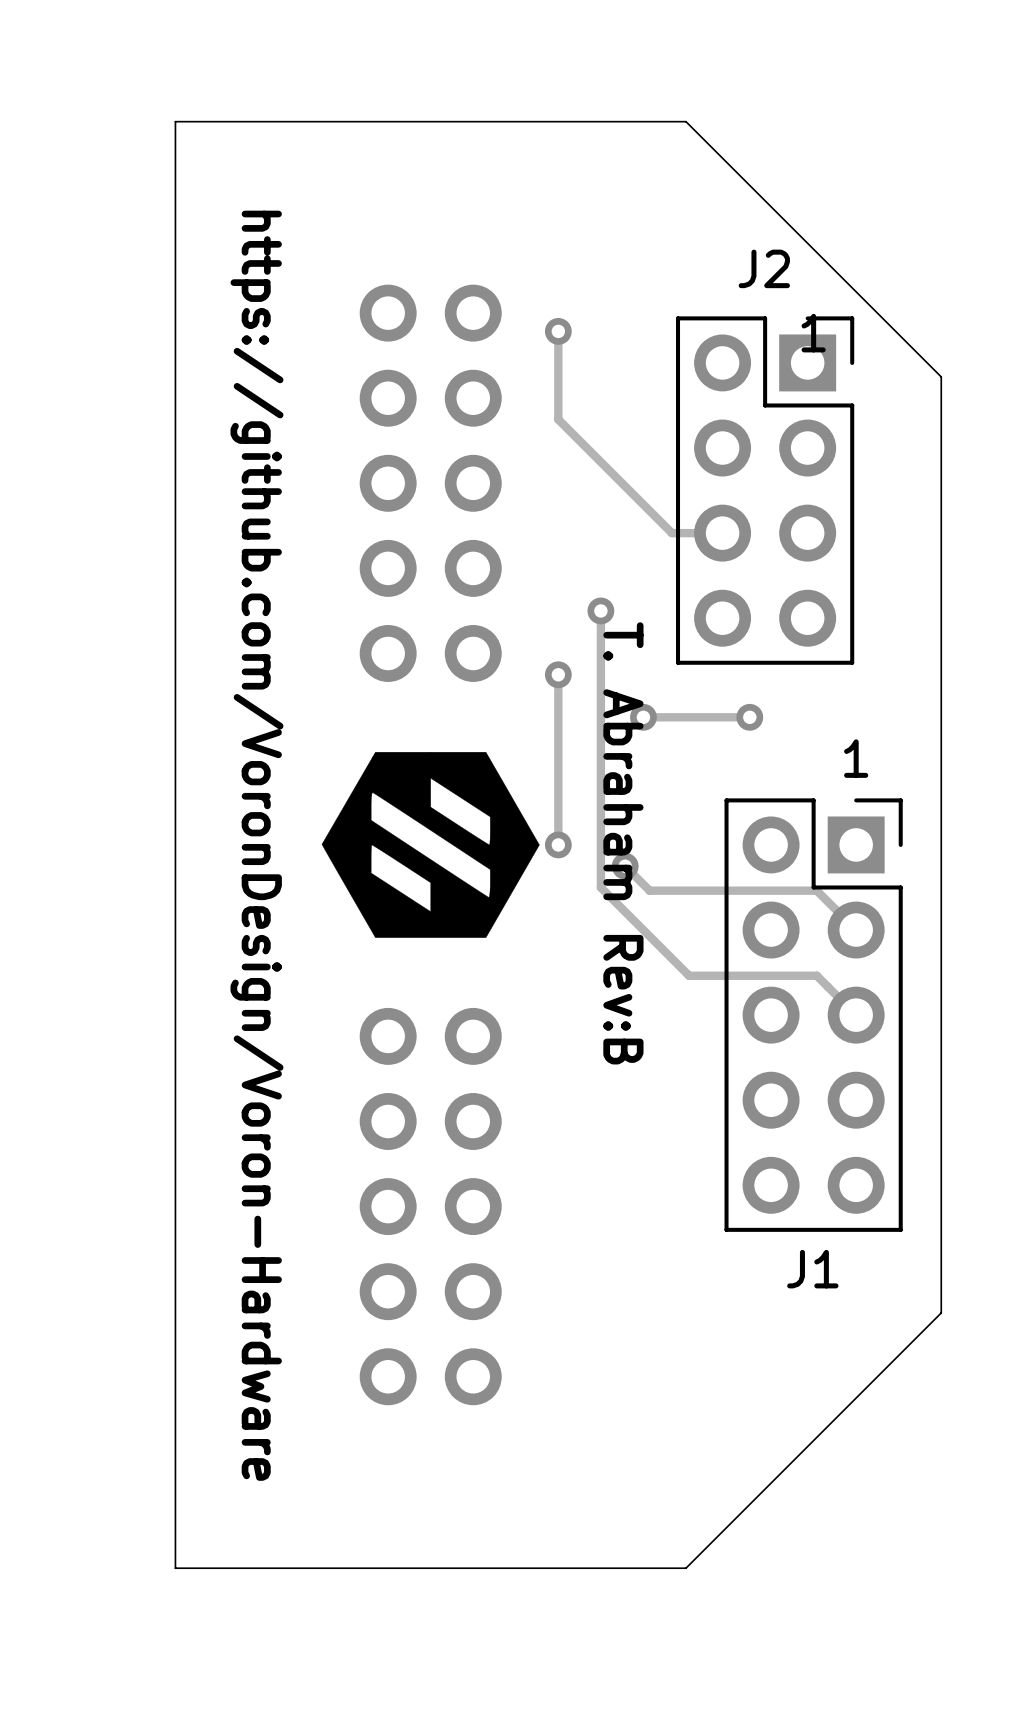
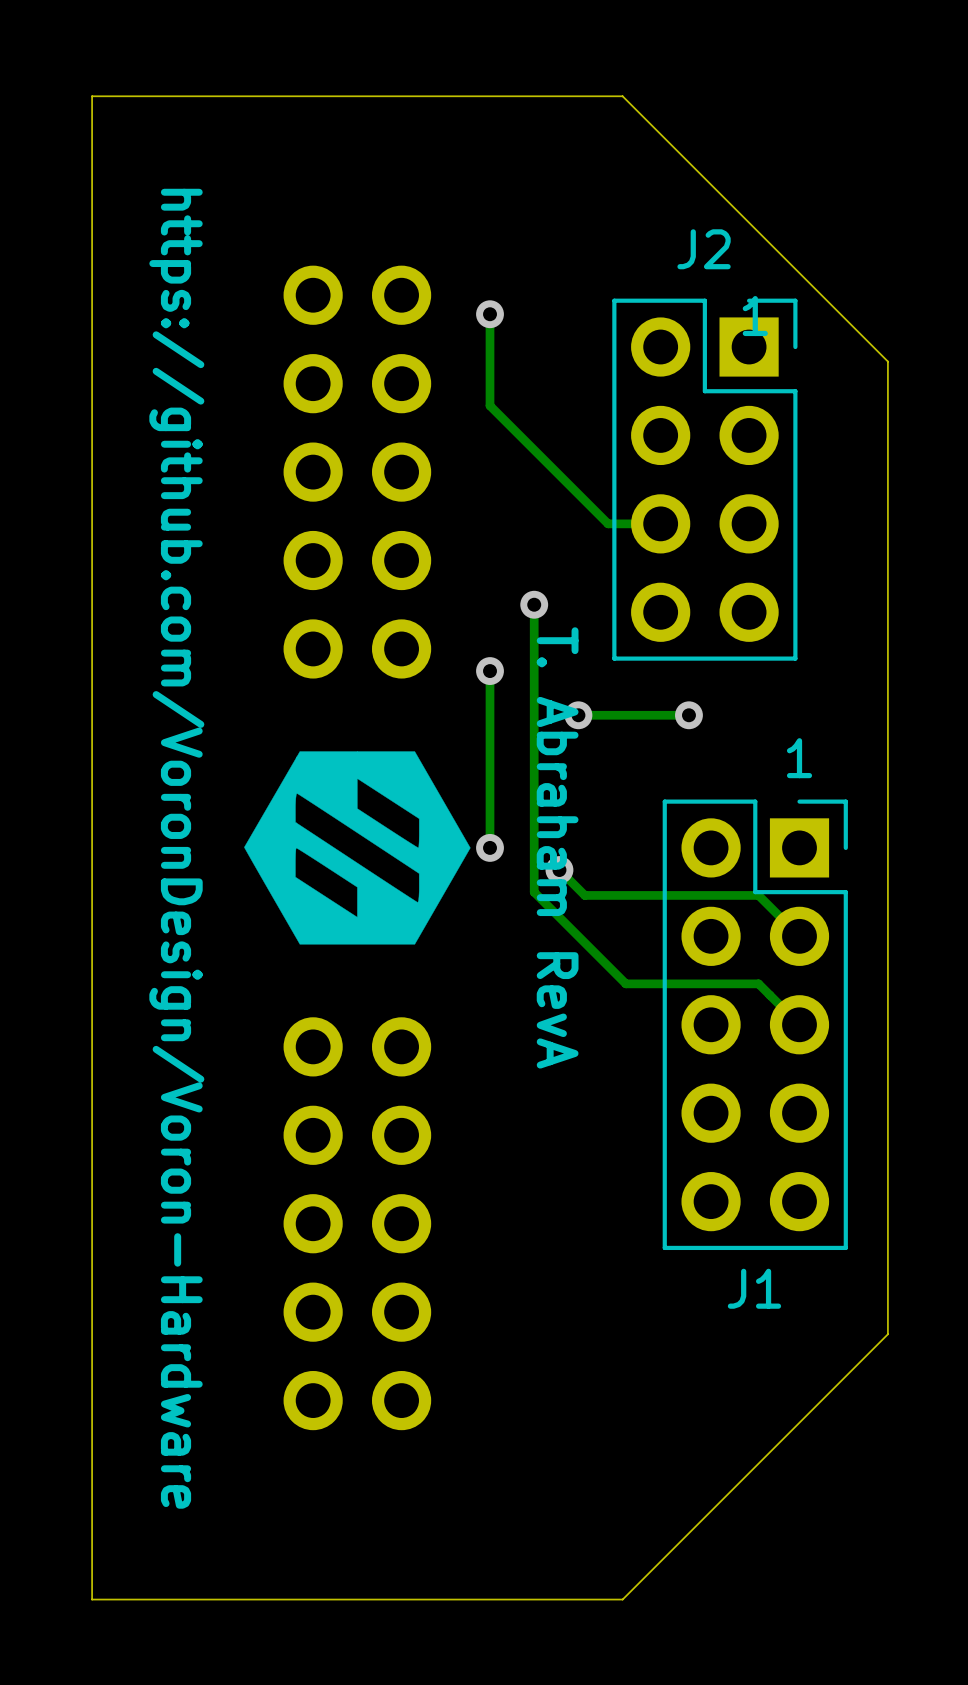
text: T. Abraham Rev:B (623, 843) -> T. Abraham RevA (557, 847)

